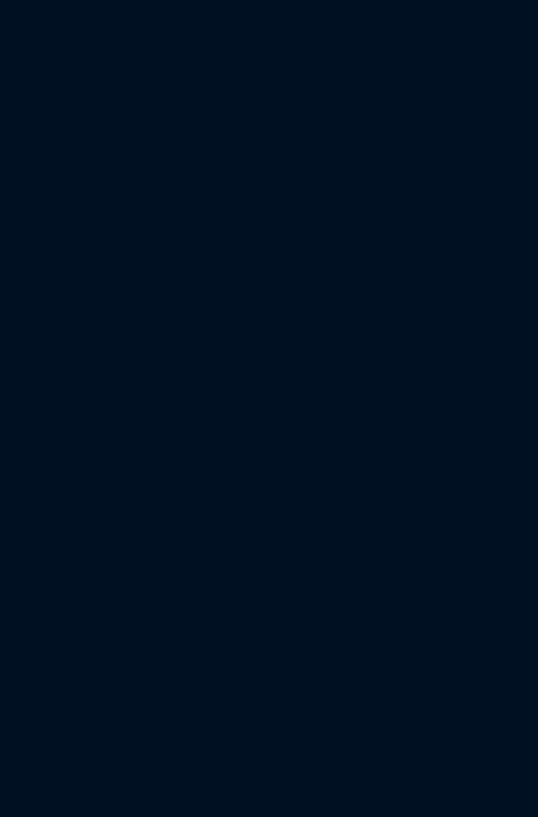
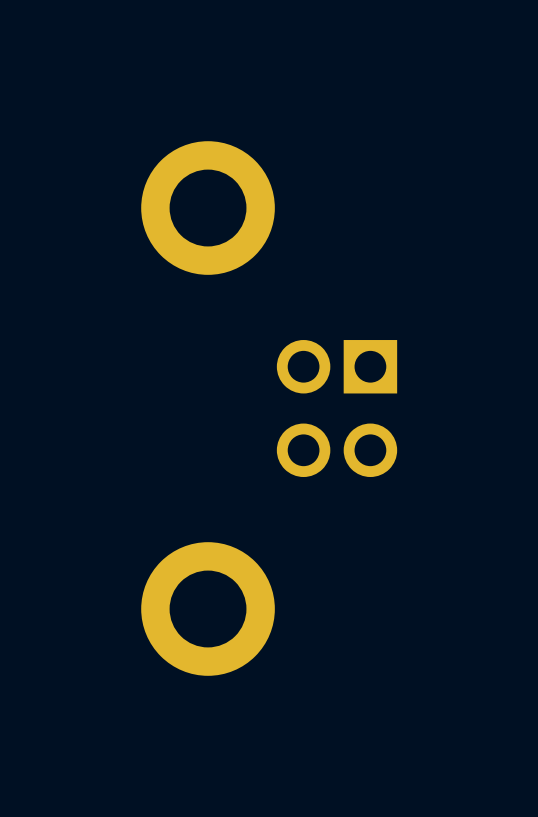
part: none -> (269, 408)

